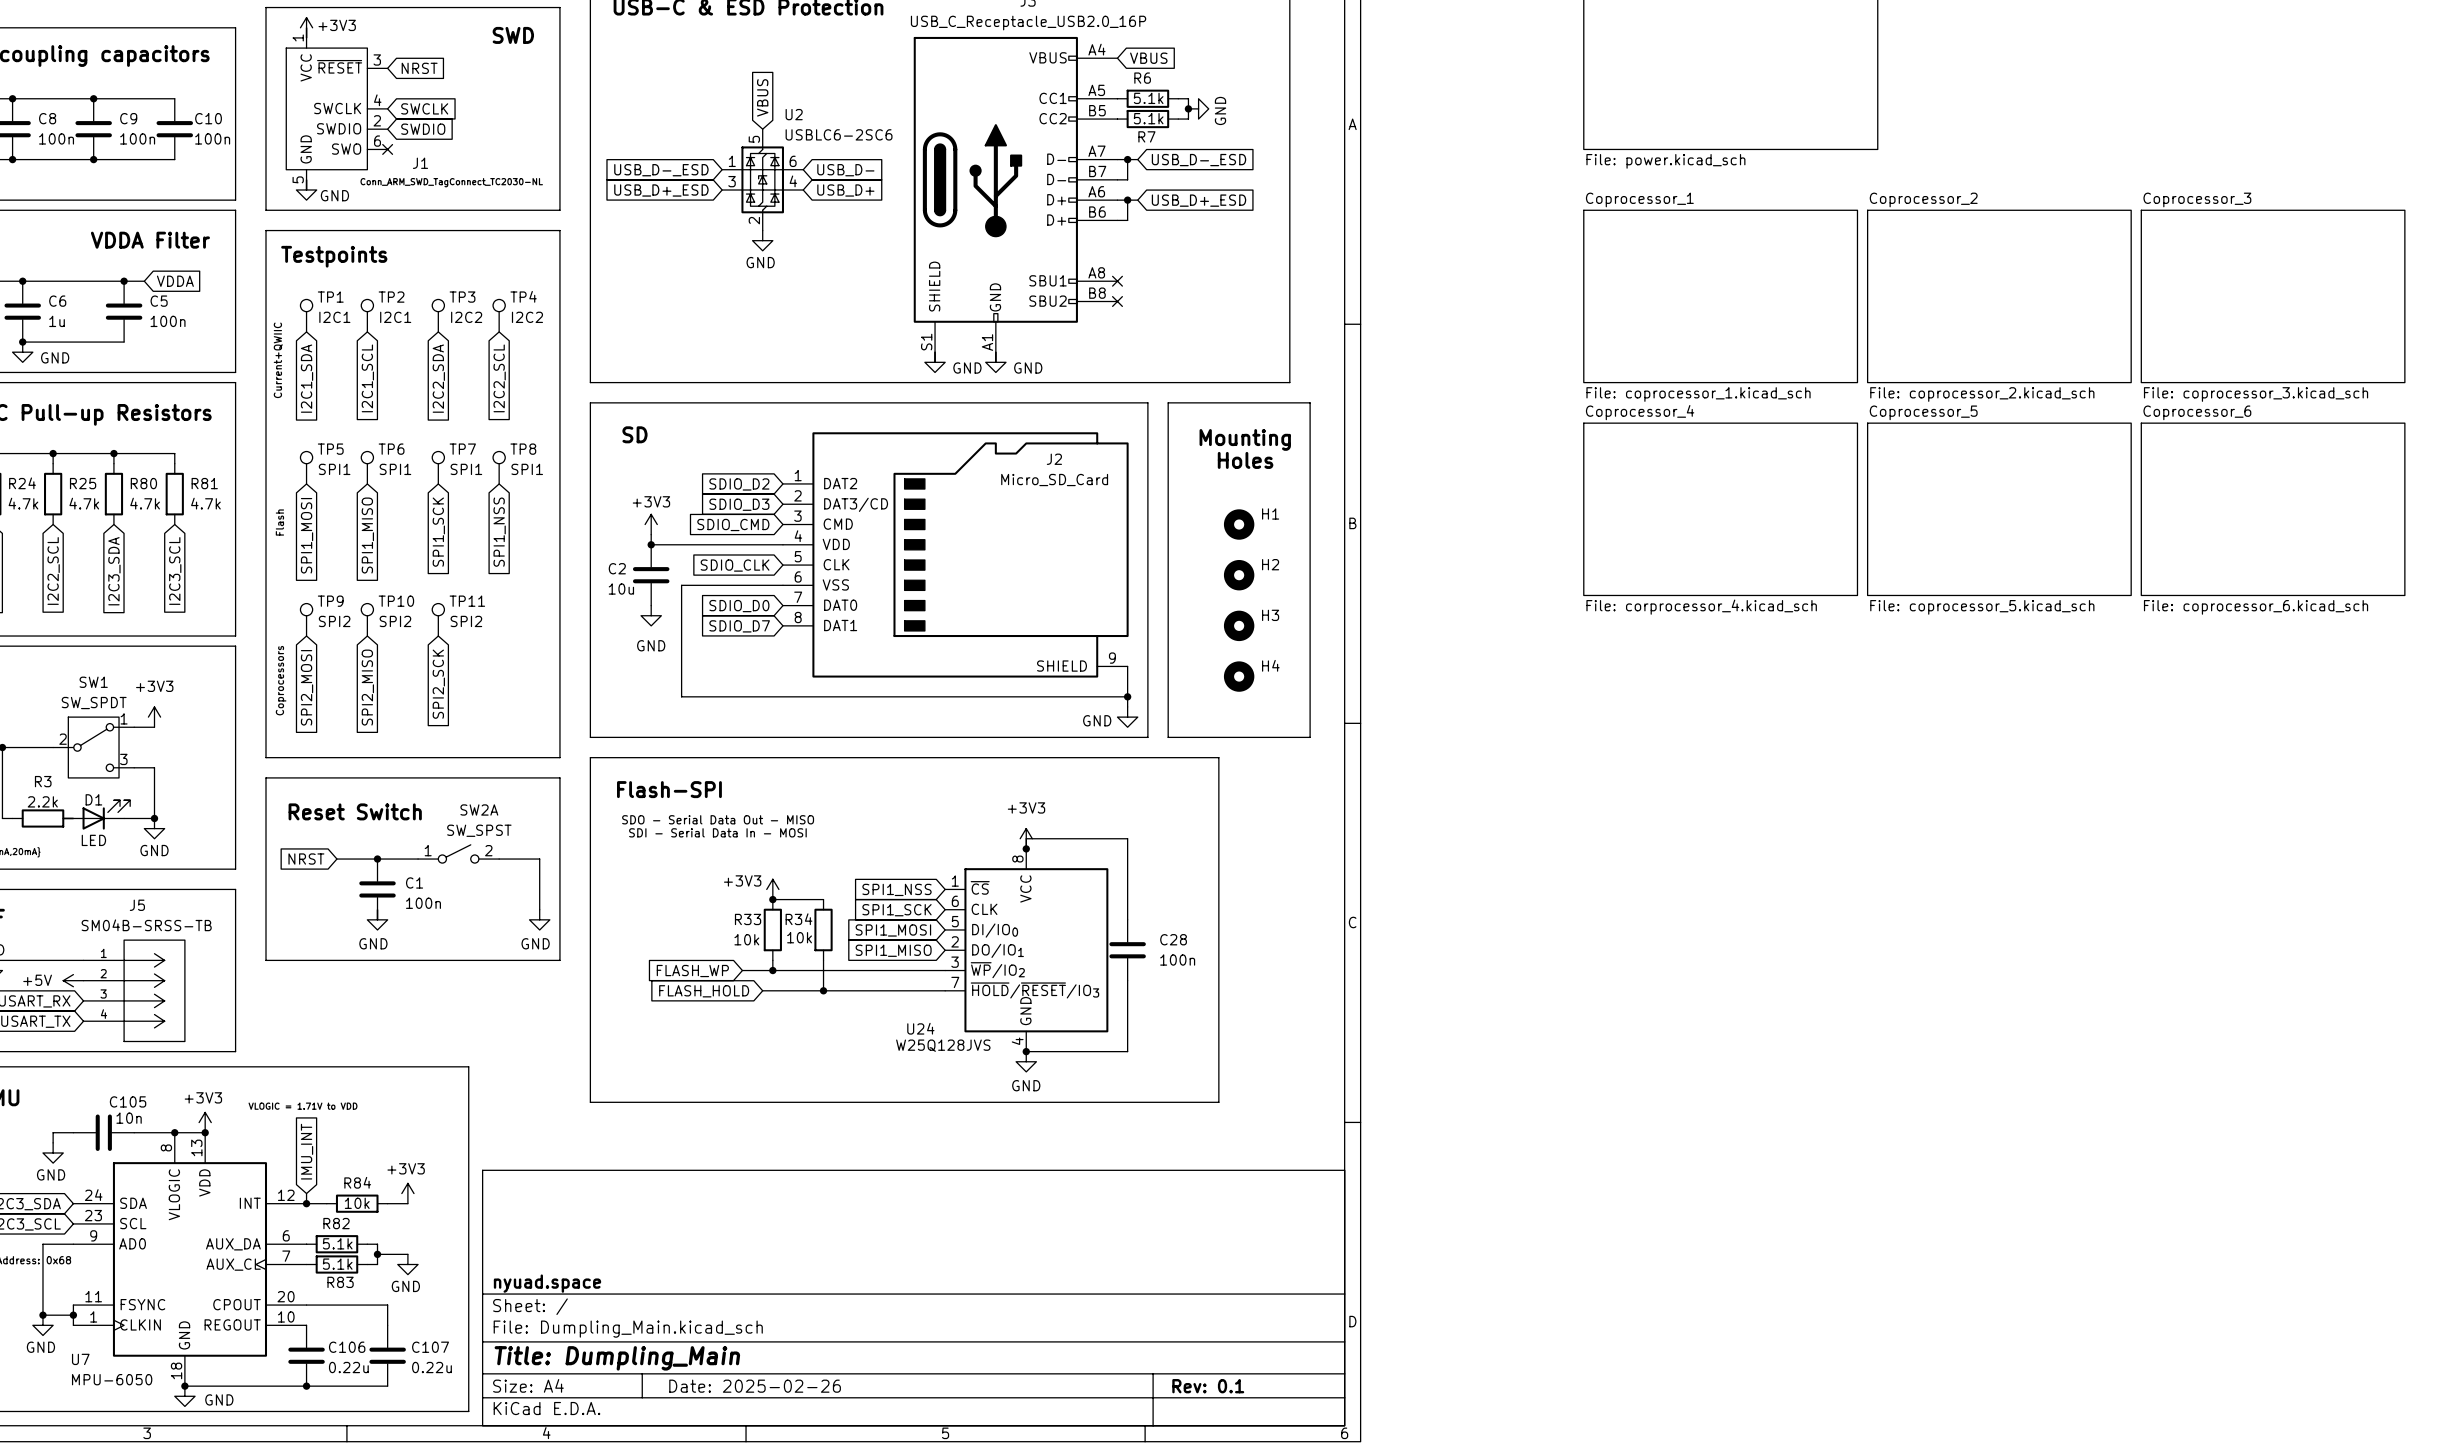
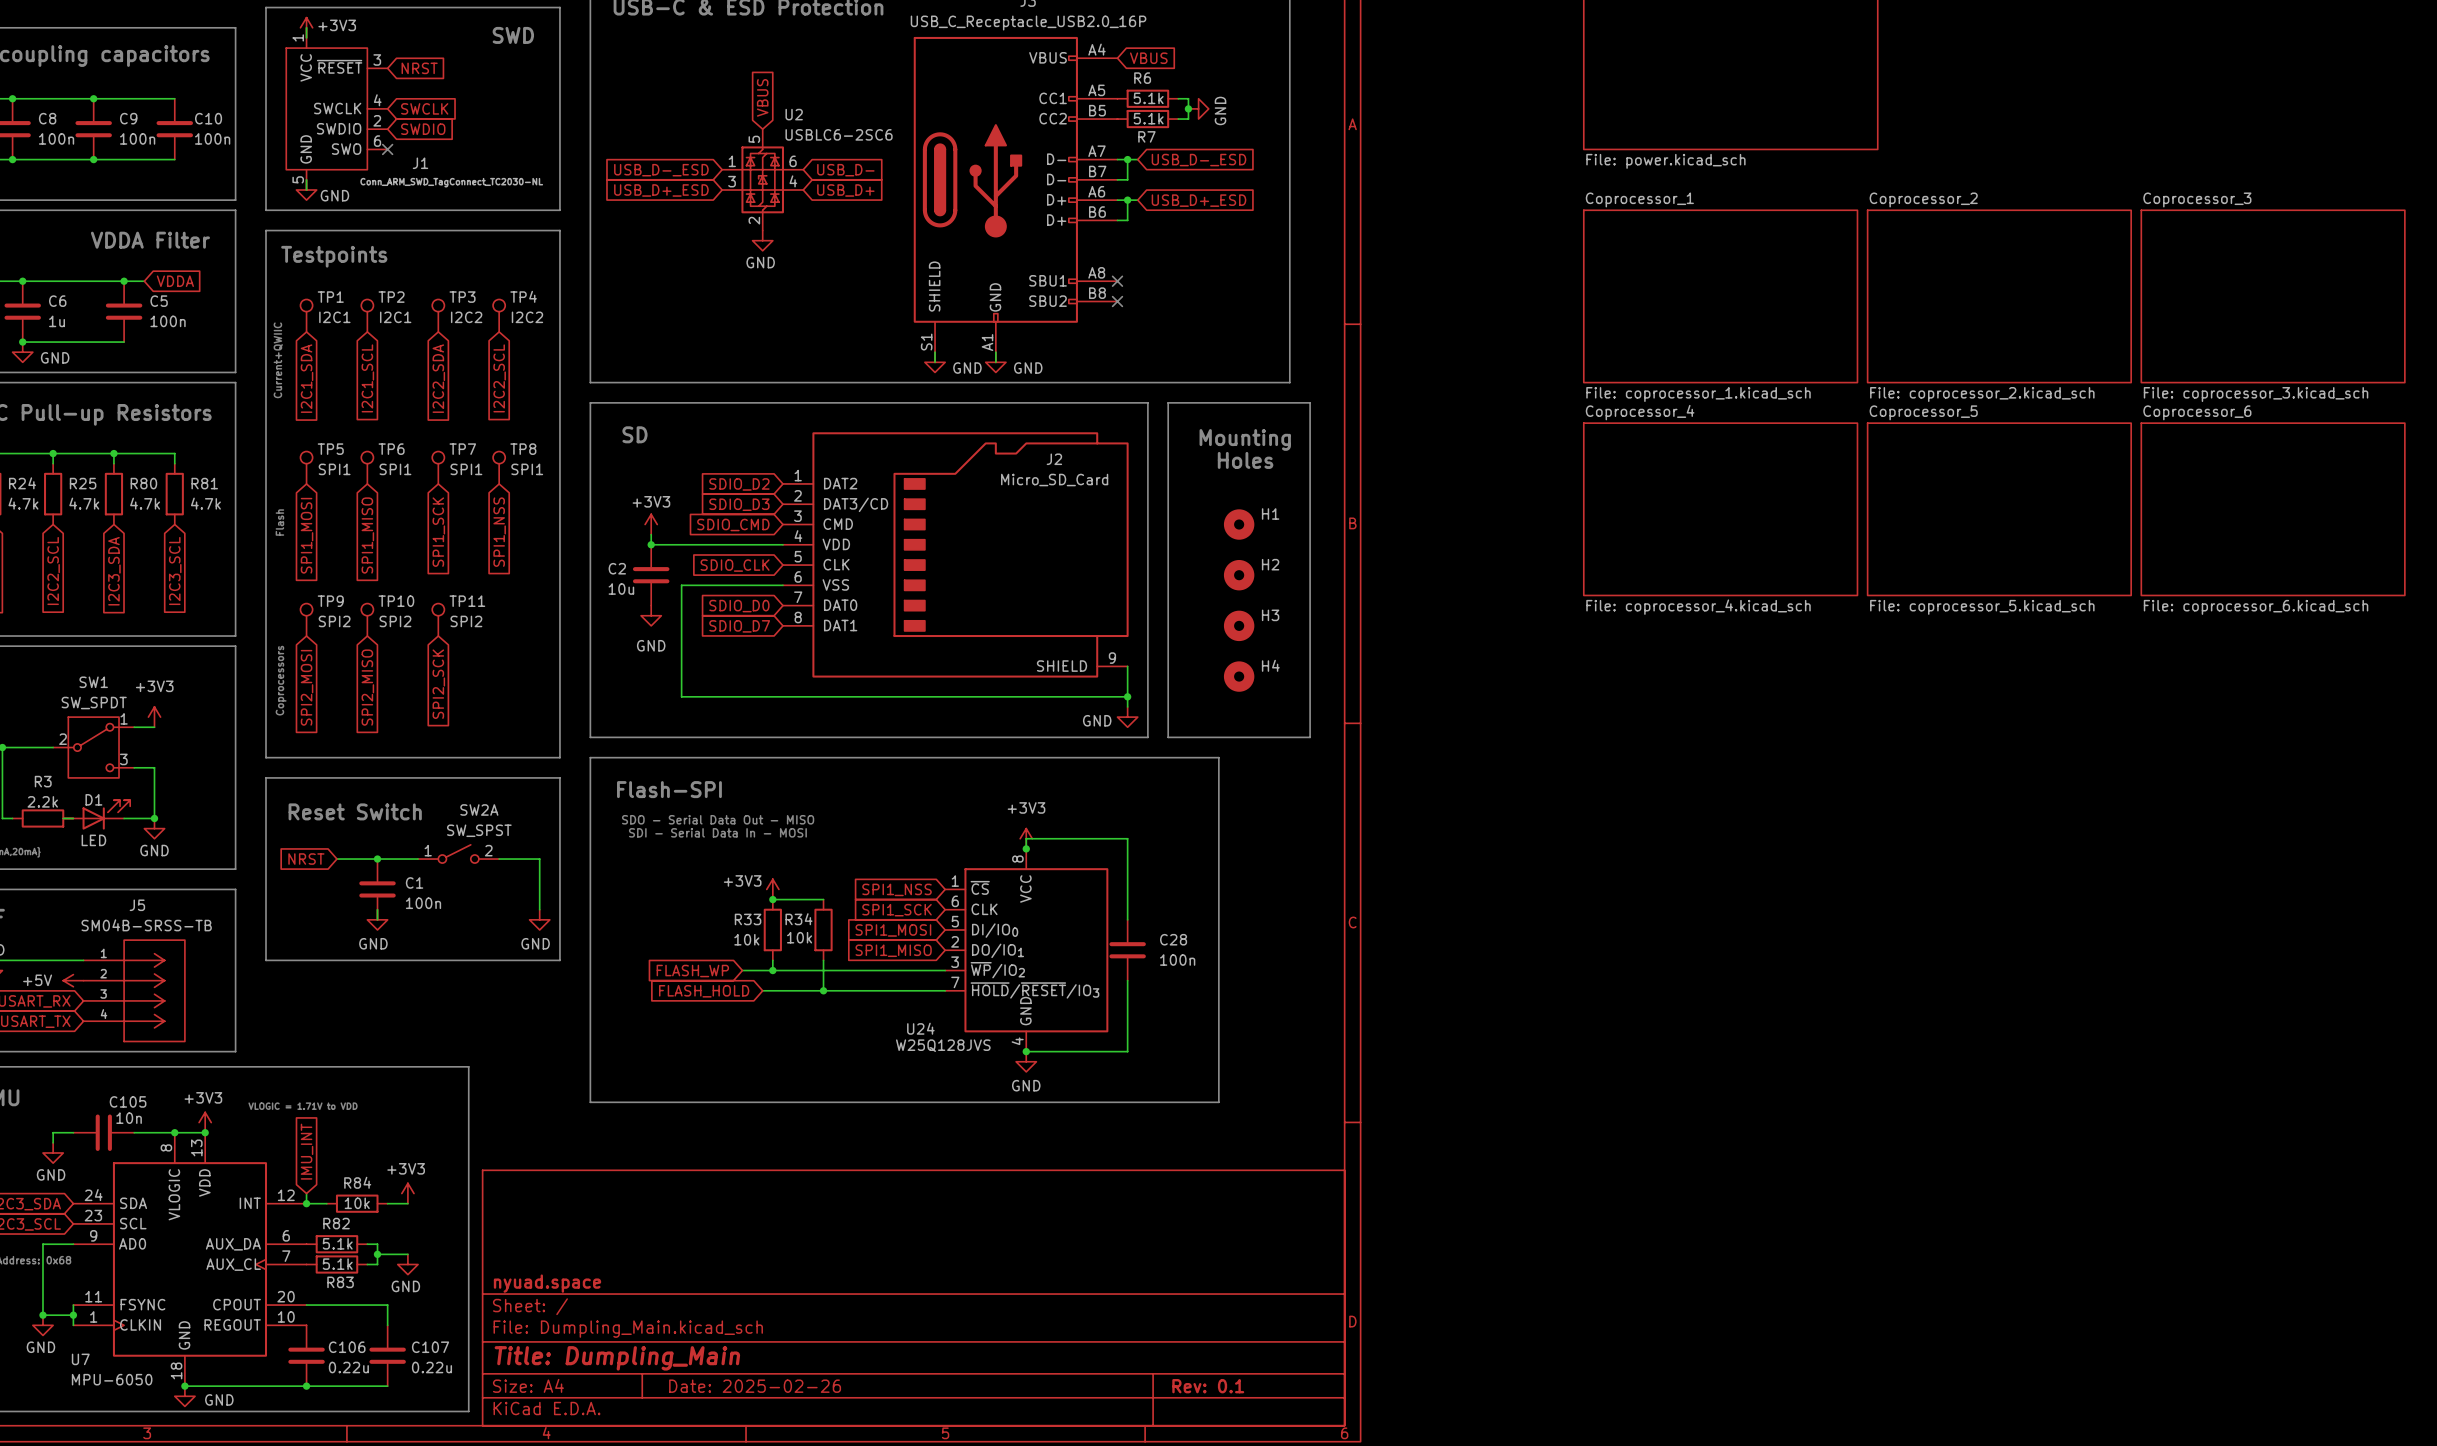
sheet Coprocessor_4 value: File: corprocessor_4.kicad_sch (1701, 607) -> File: coprocessor_4.kicad_sch (1698, 607)

